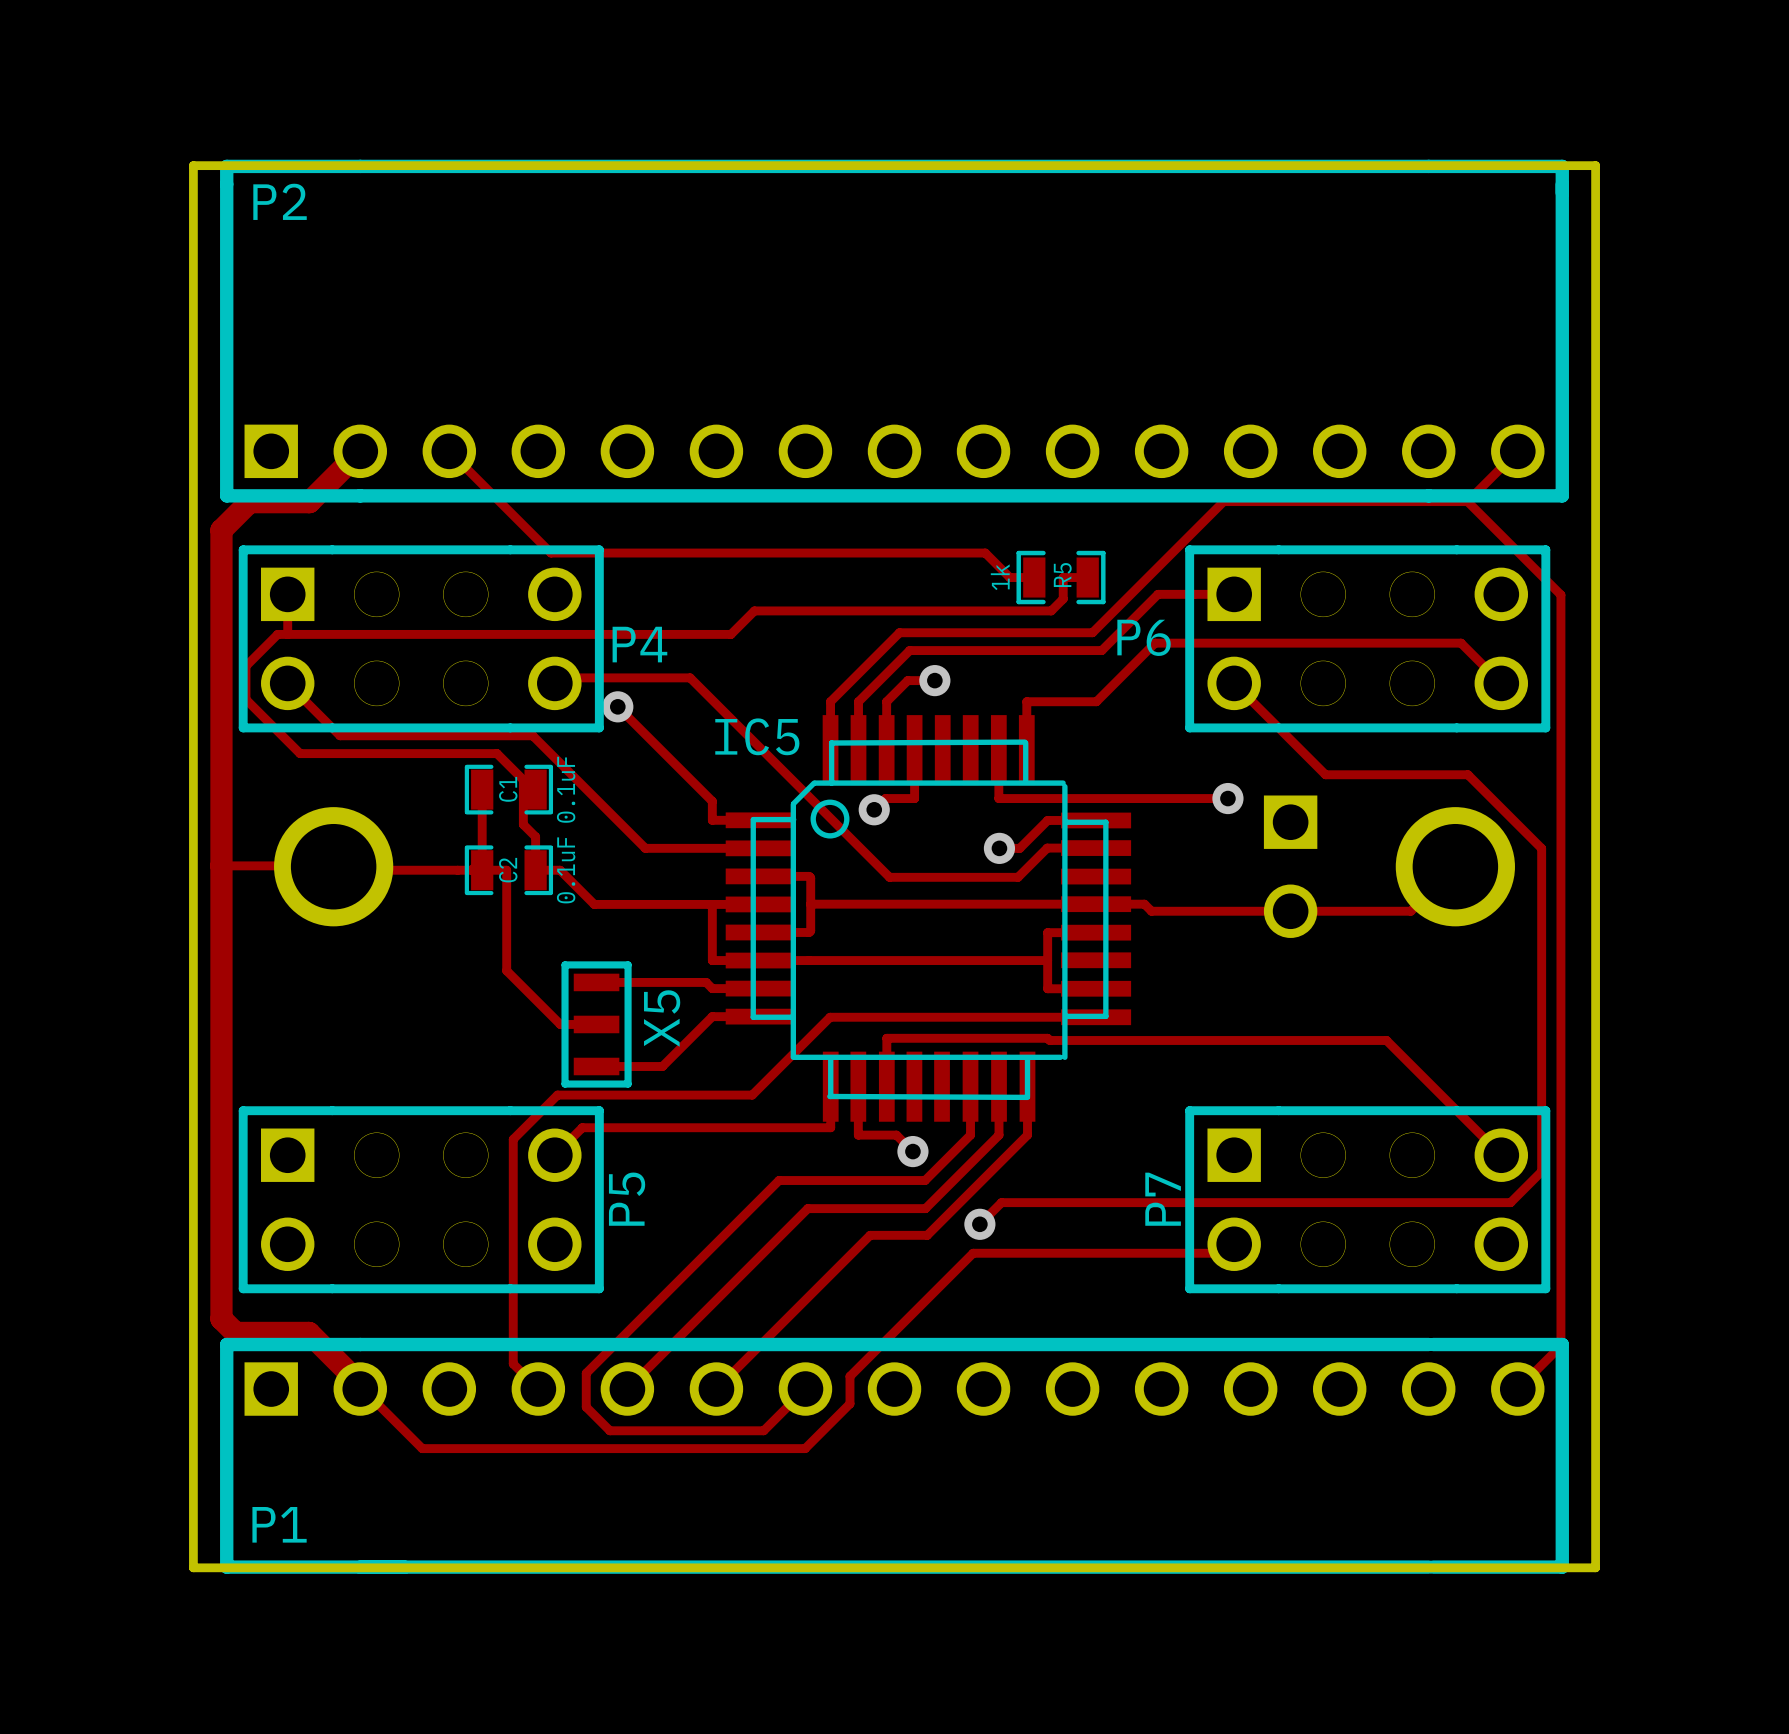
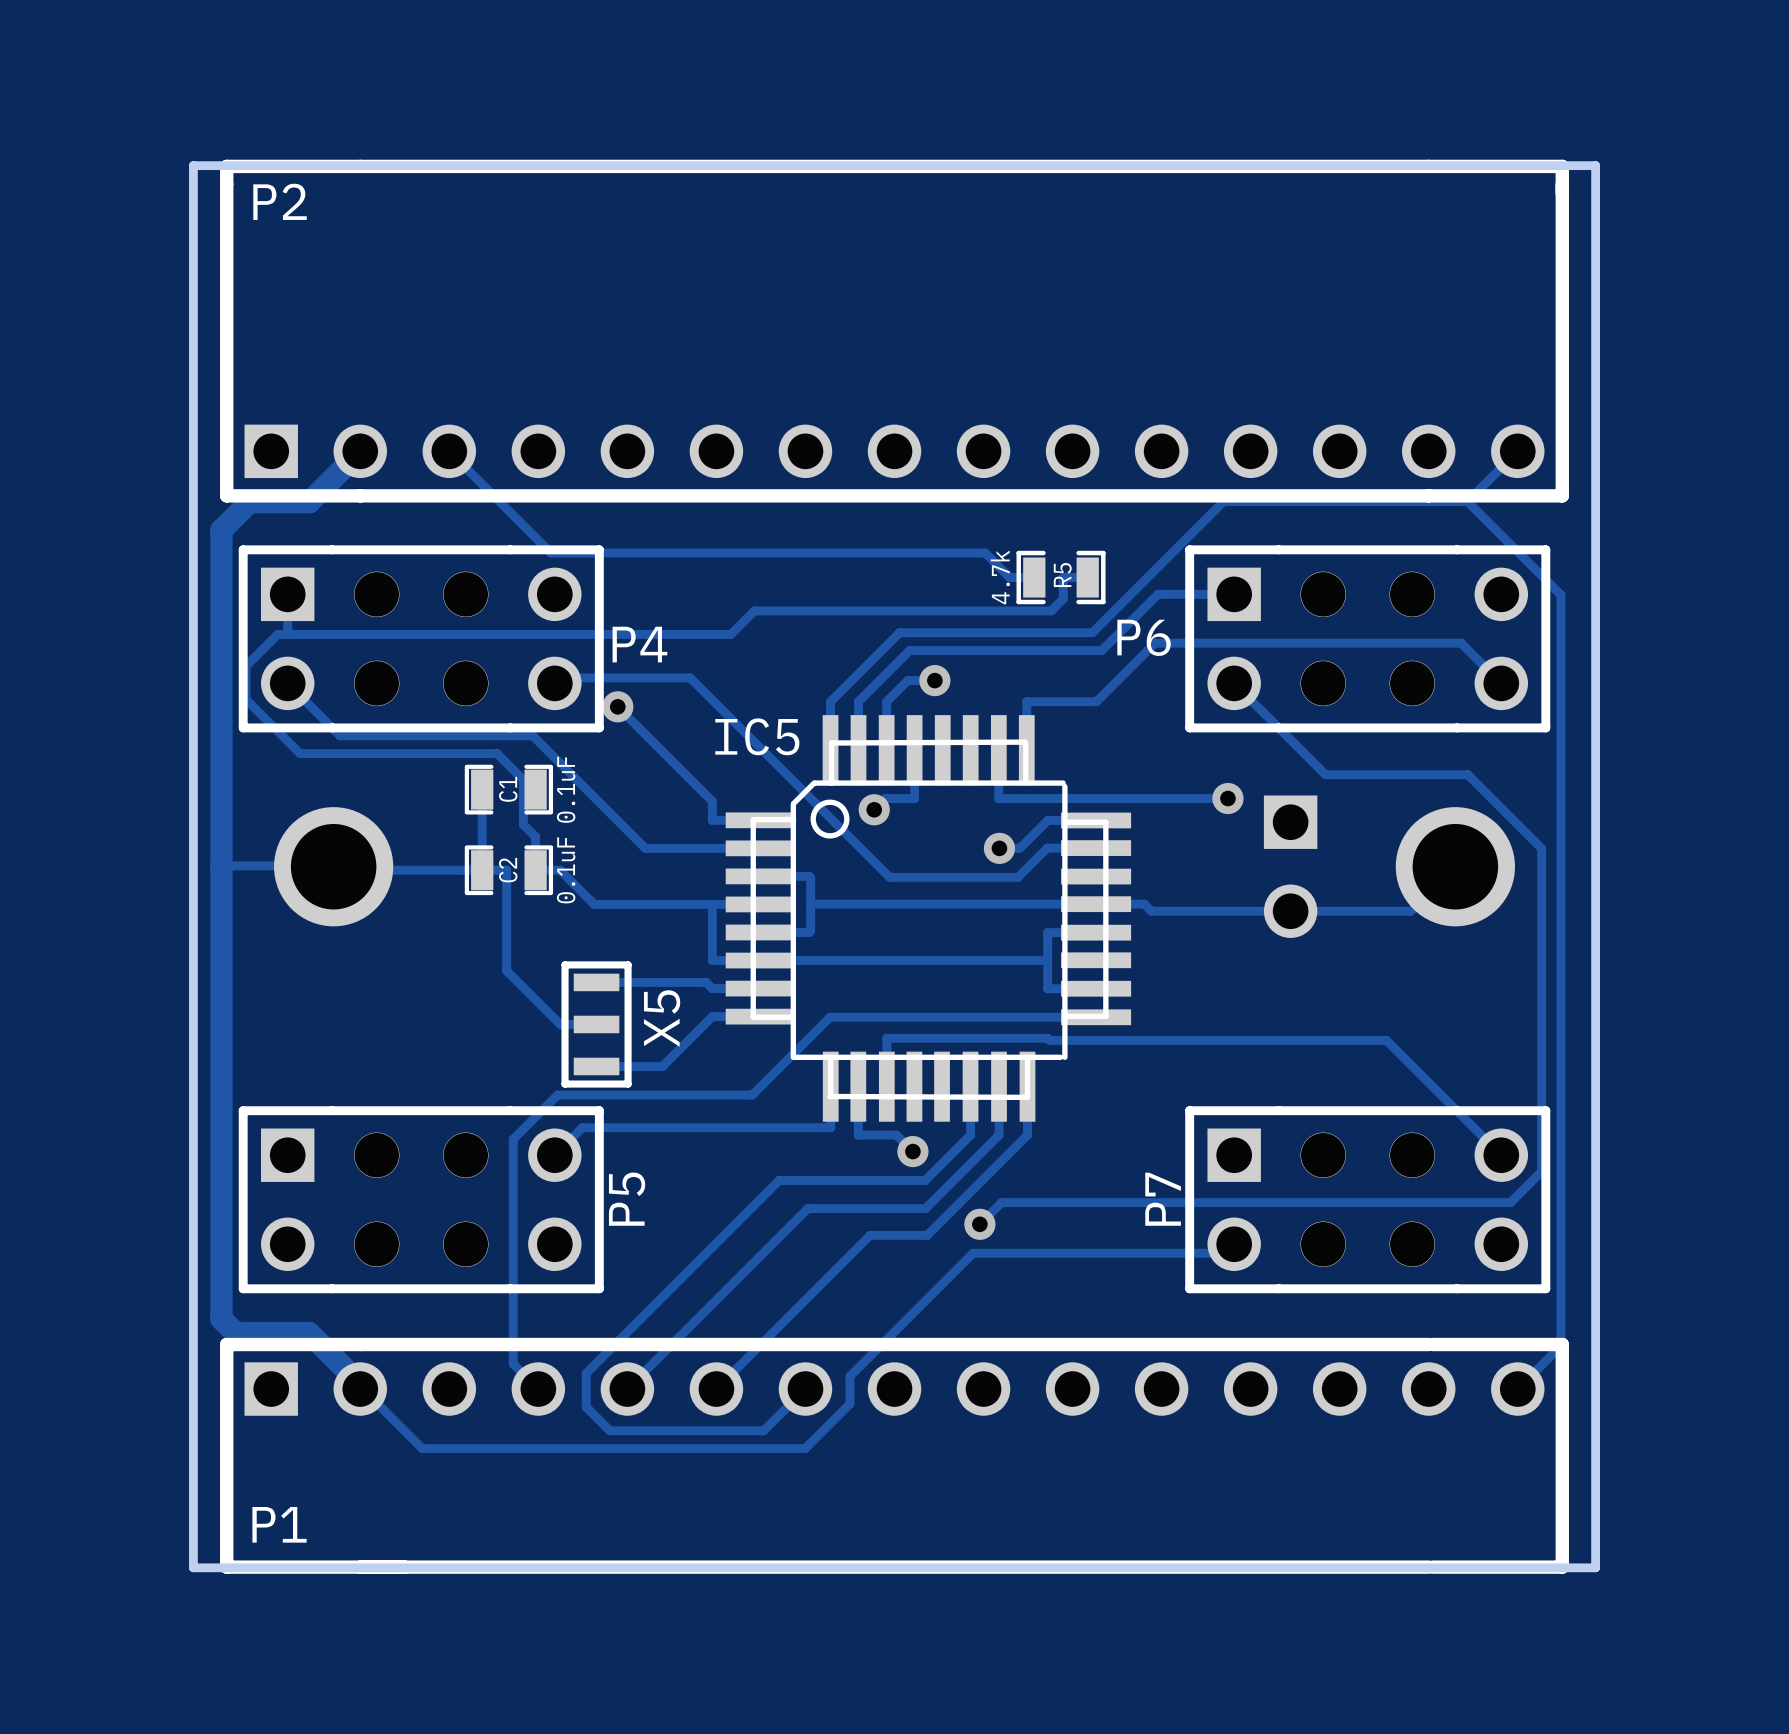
R5 value: 1k (1000, 577) -> 4.7k (1000, 577)

